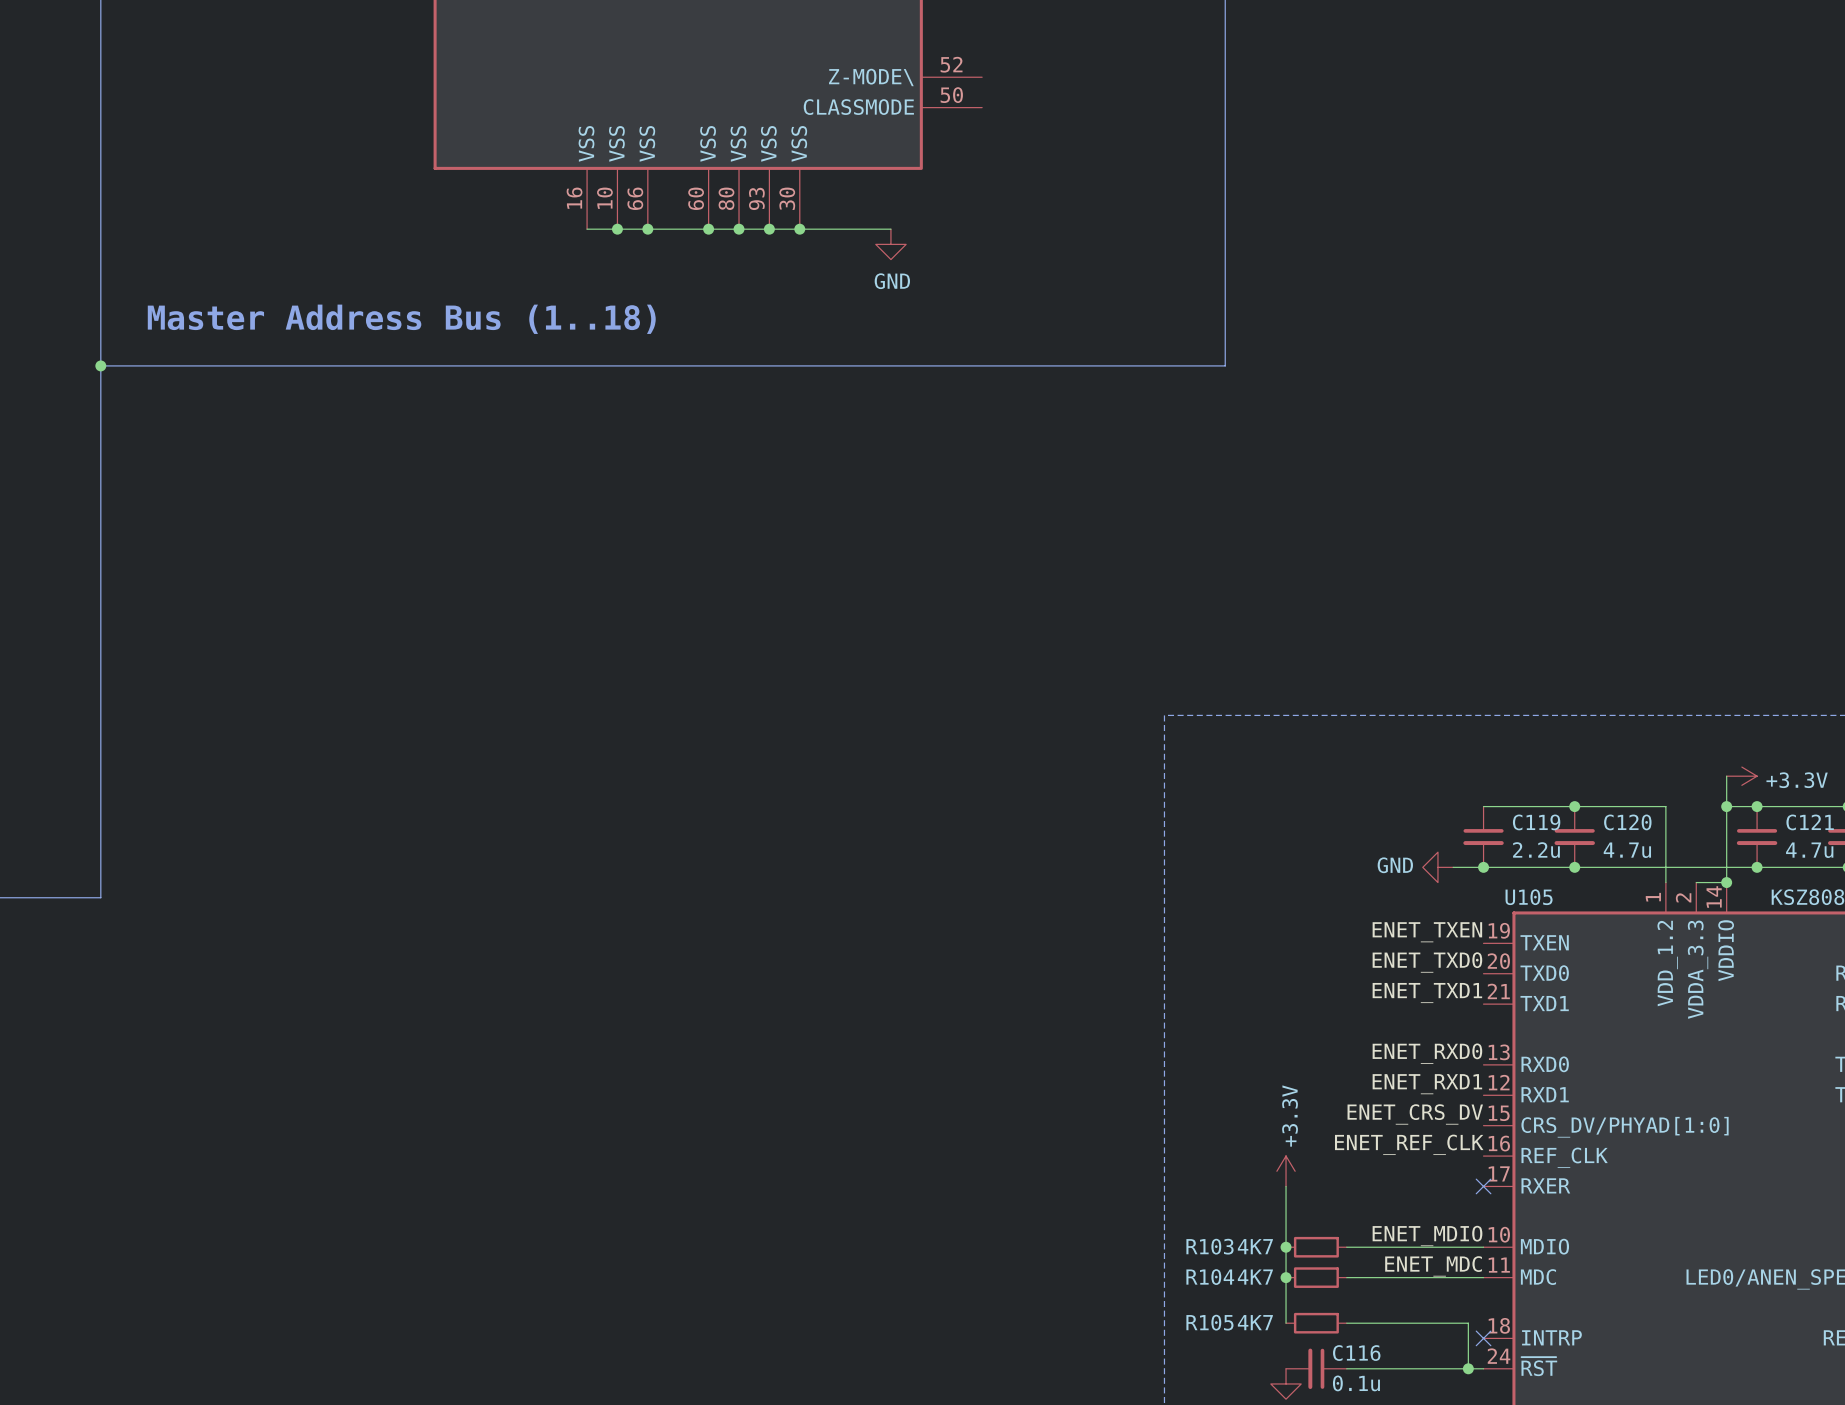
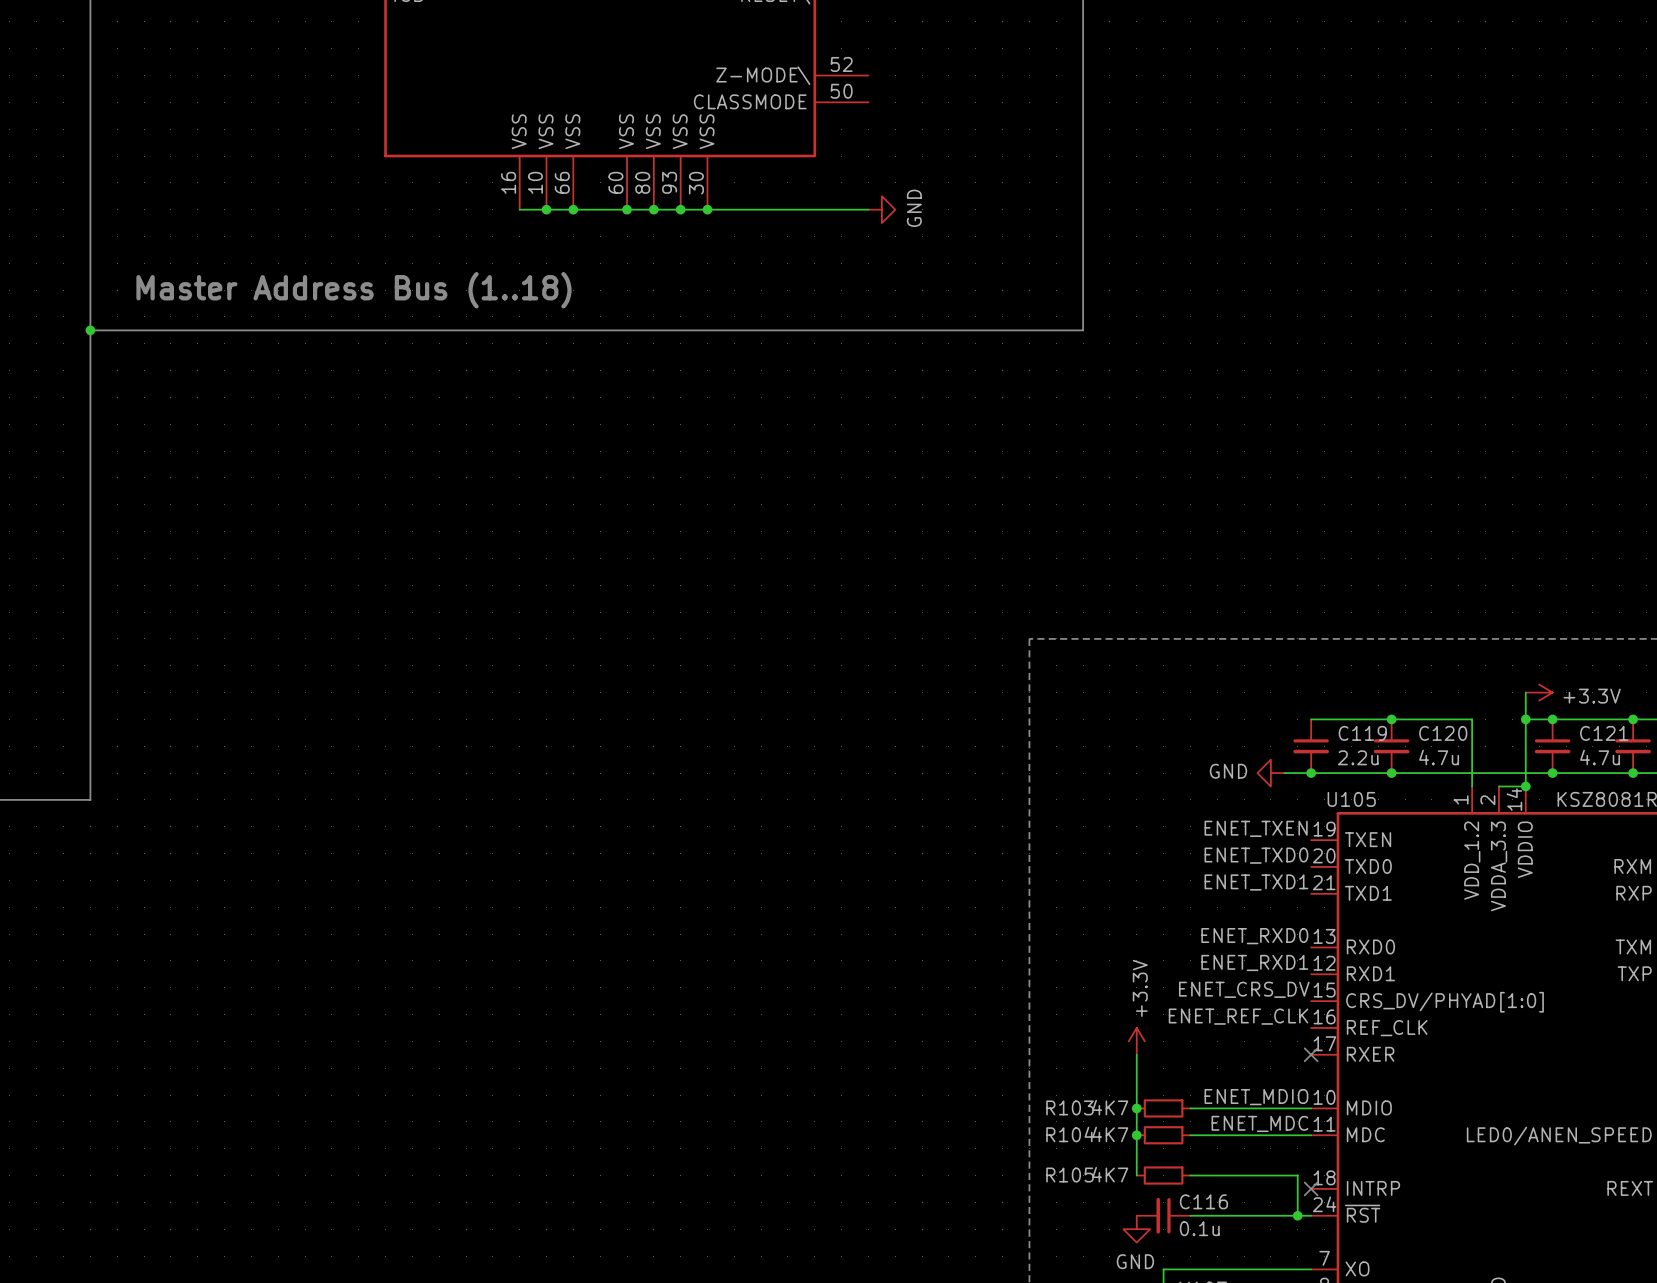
wire: none -> (787, 209) (868, 209)
power symbol rotation: 0° (890, 244) -> 90° counterclockwise (881, 209)
power symbol position: GND (890, 244) -> GND (881, 209)

